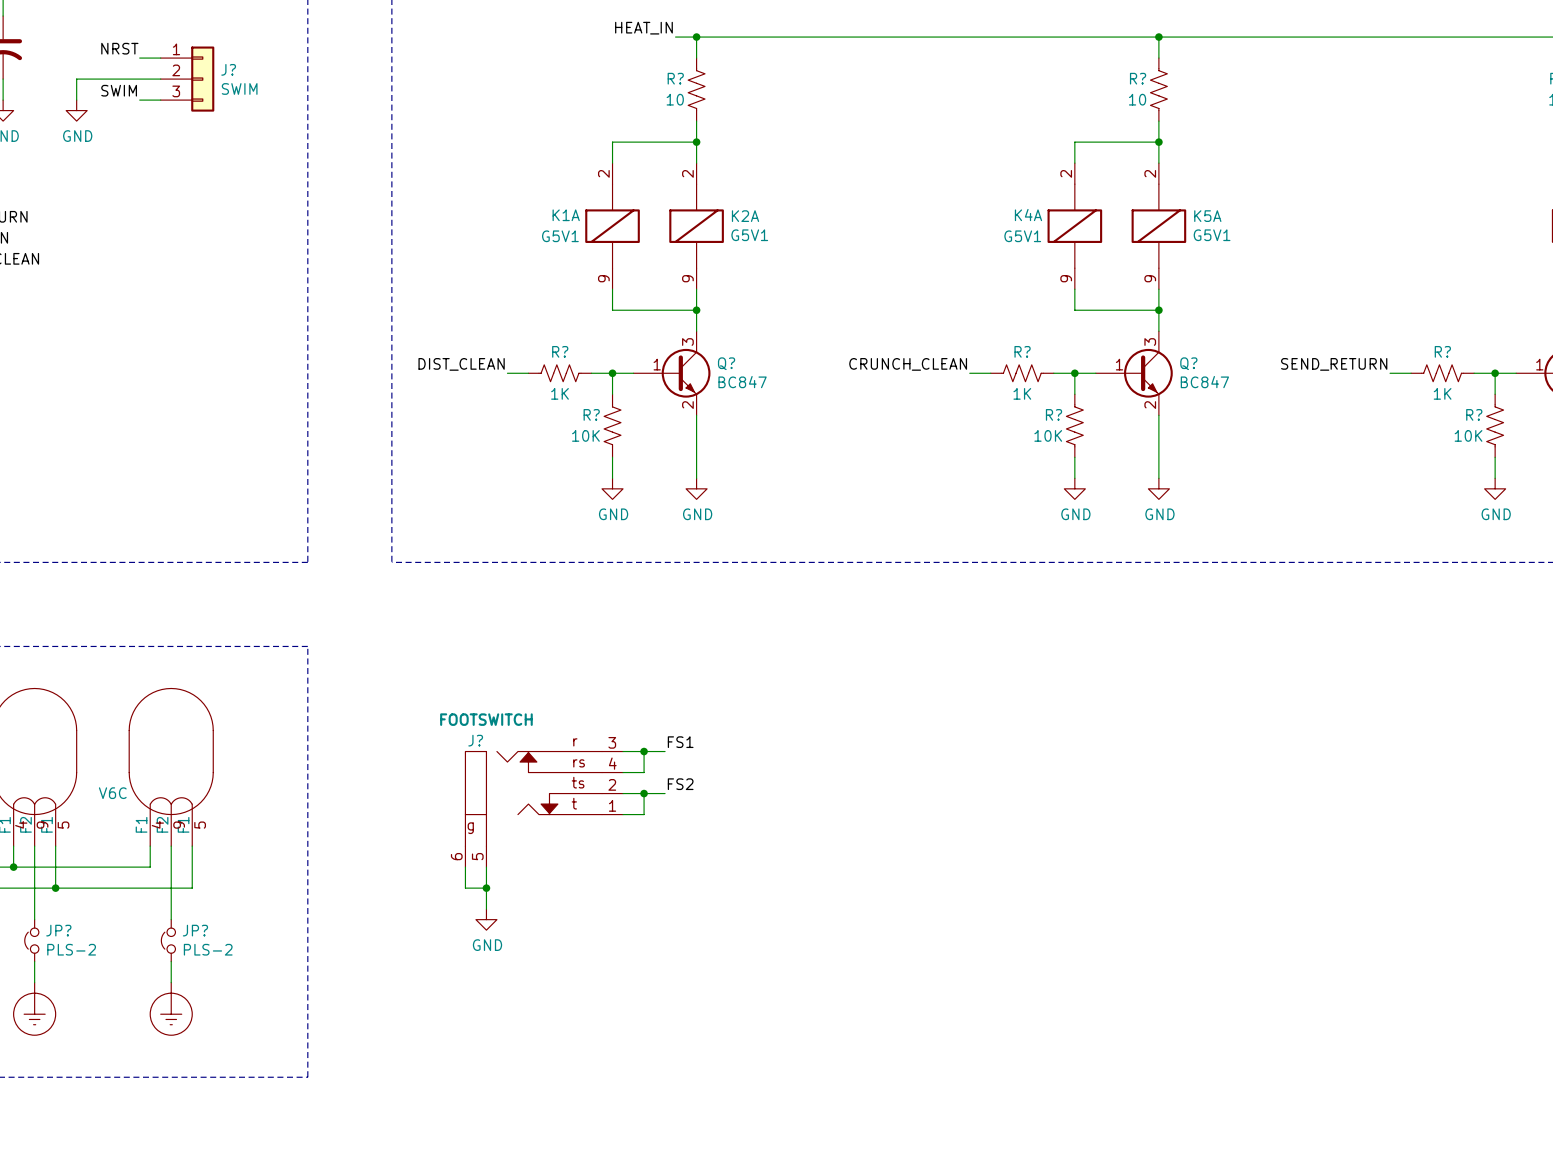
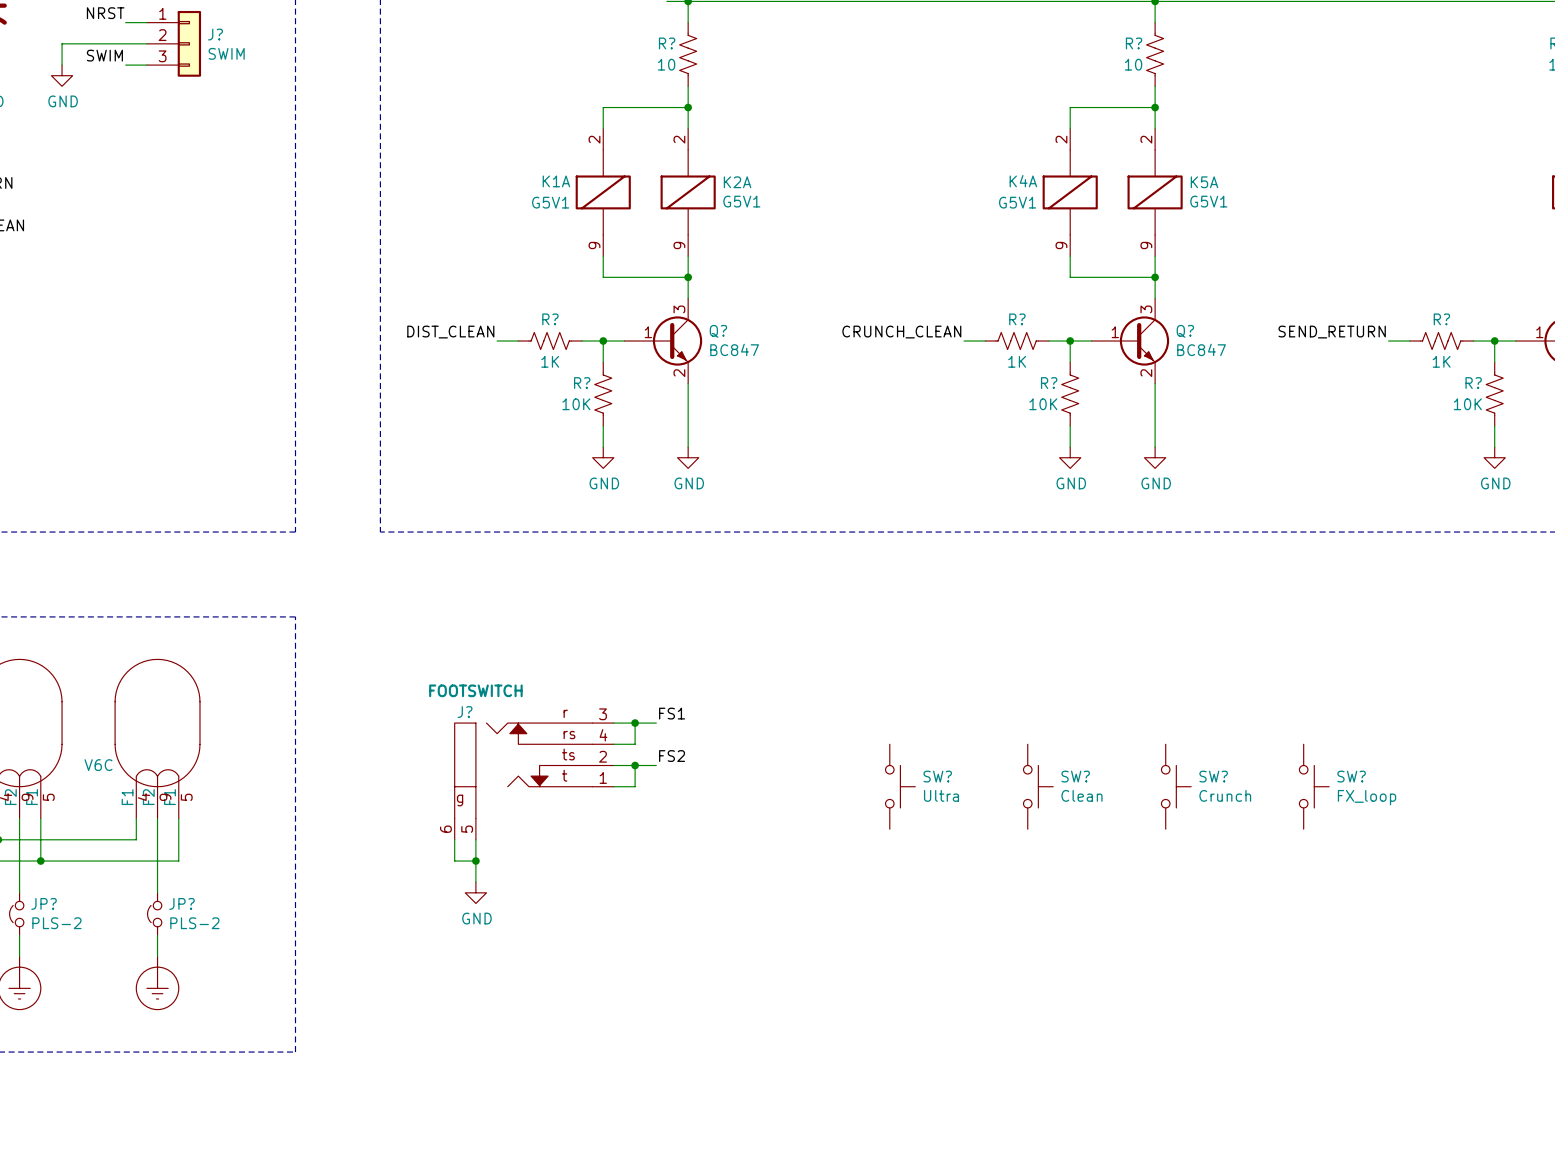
SW?: none -> Ultra (900, 786)
SW?: none -> Clean (1038, 786)
SW?: none -> Crunch (1176, 786)
SW?: none -> FX_loop (1314, 786)

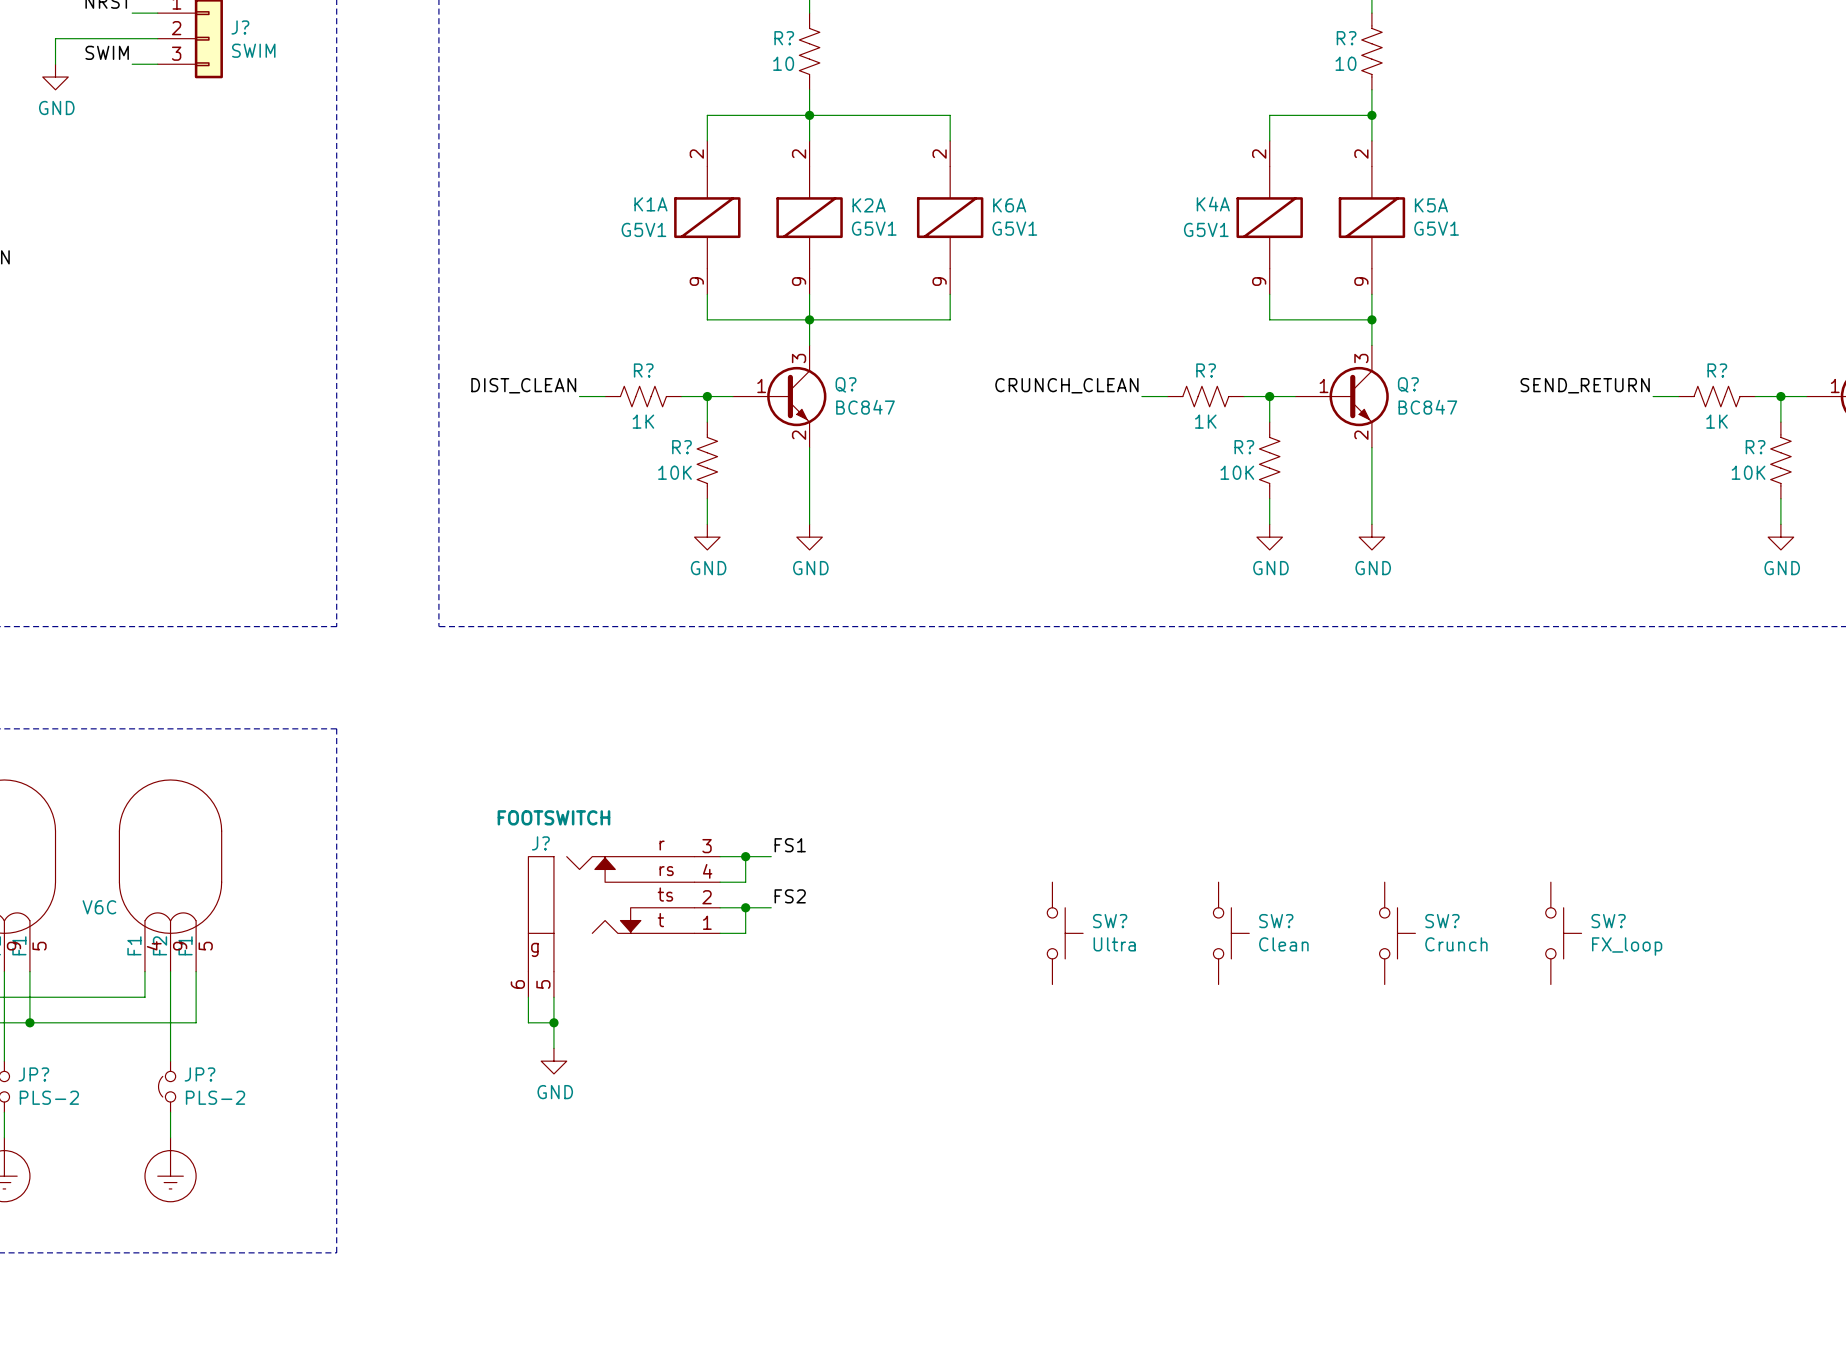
wire: none -> (809, 115) (950, 115) (950, 140)
K6A: none -> G5V1 (950, 217)
wire: none -> (950, 294) (950, 319) (809, 319)

